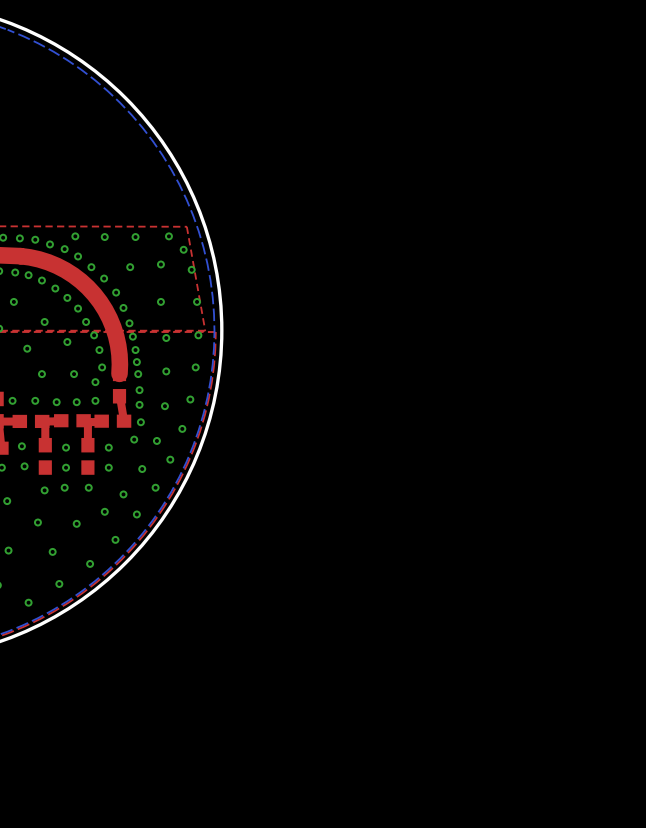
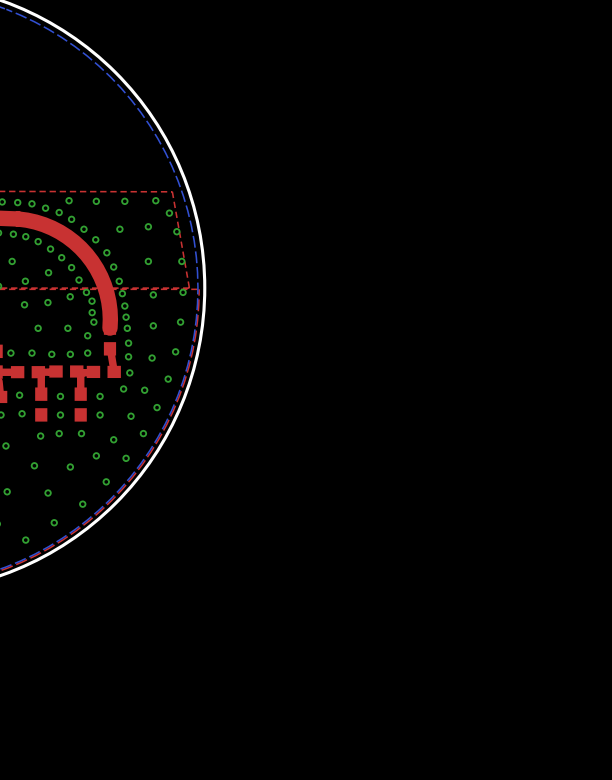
via: none -> (48, 272)
via: (44, 321) -> none
via: none -> (25, 281)
via: none -> (70, 296)
via: (67, 342) -> none
via: none -> (92, 301)
via: none -> (47, 302)
via: (99, 350) -> none
via: none -> (92, 312)

